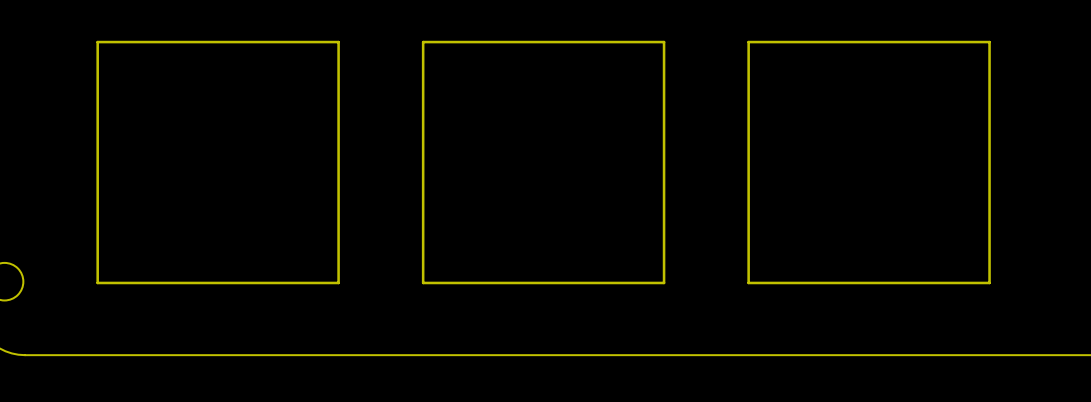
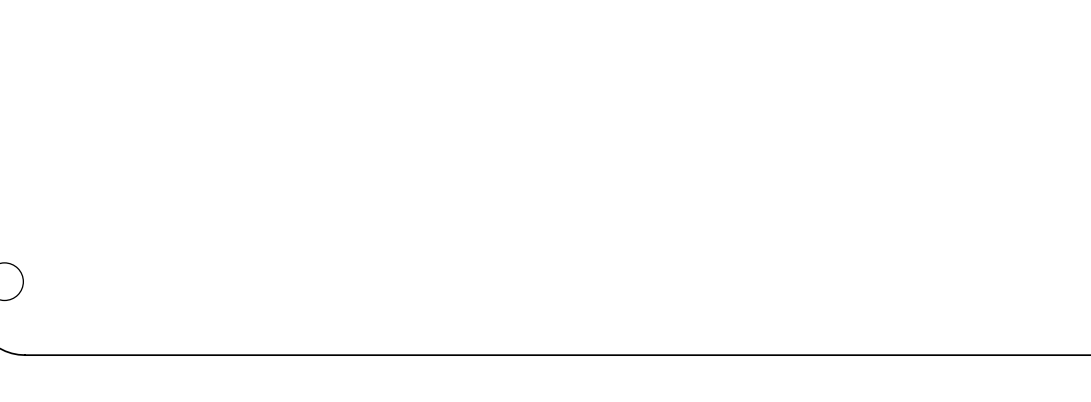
drawing: [96, 40, 340, 285] -> none
drawing: [421, 40, 666, 285] -> none
drawing: [747, 40, 991, 285] -> none

